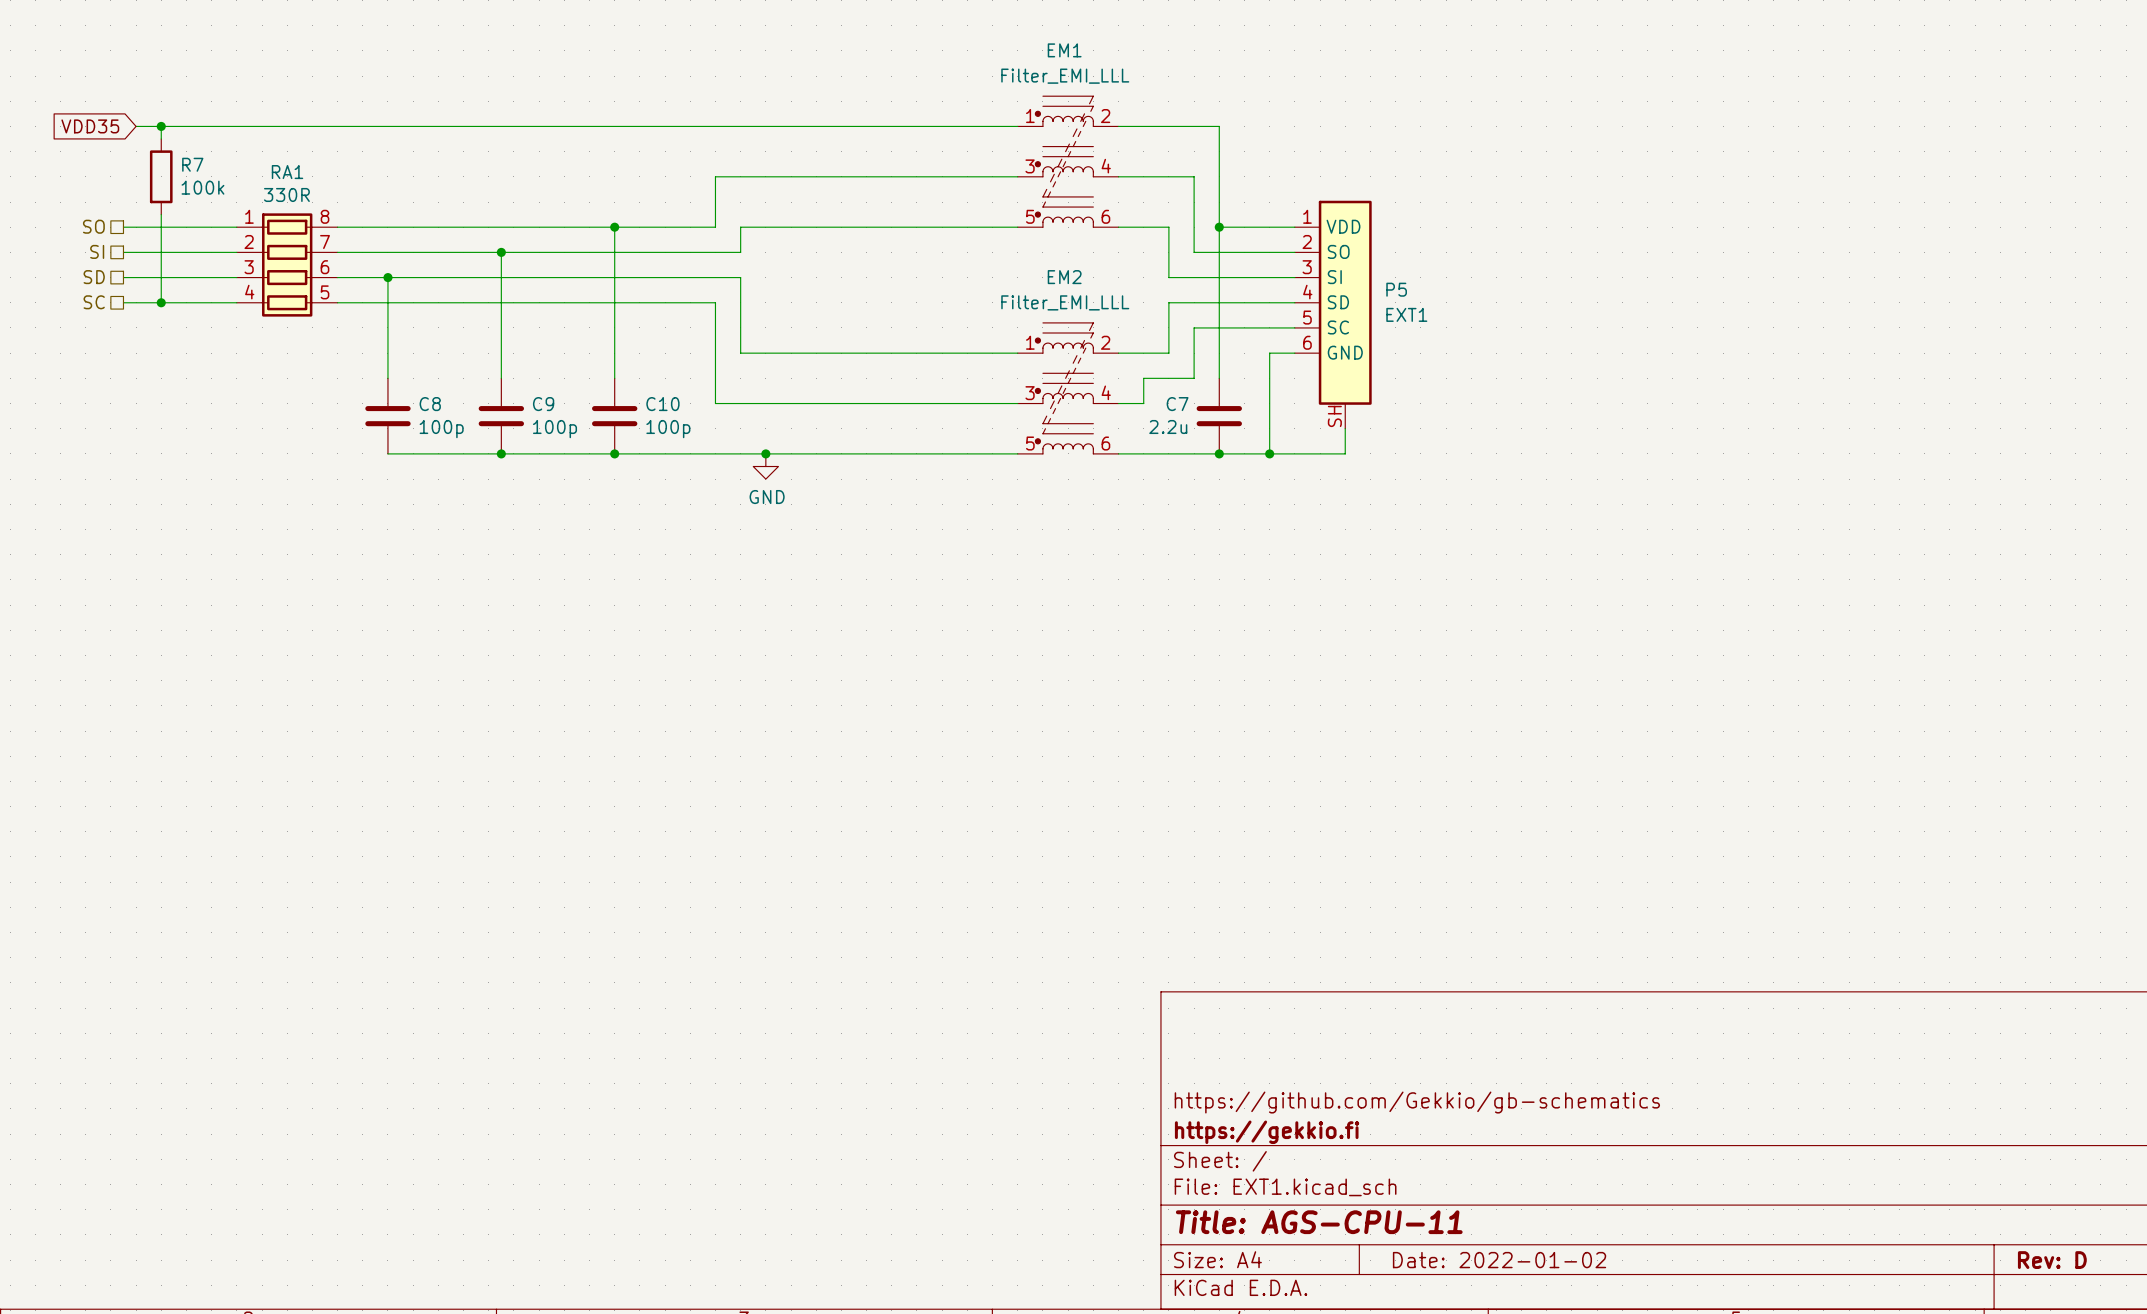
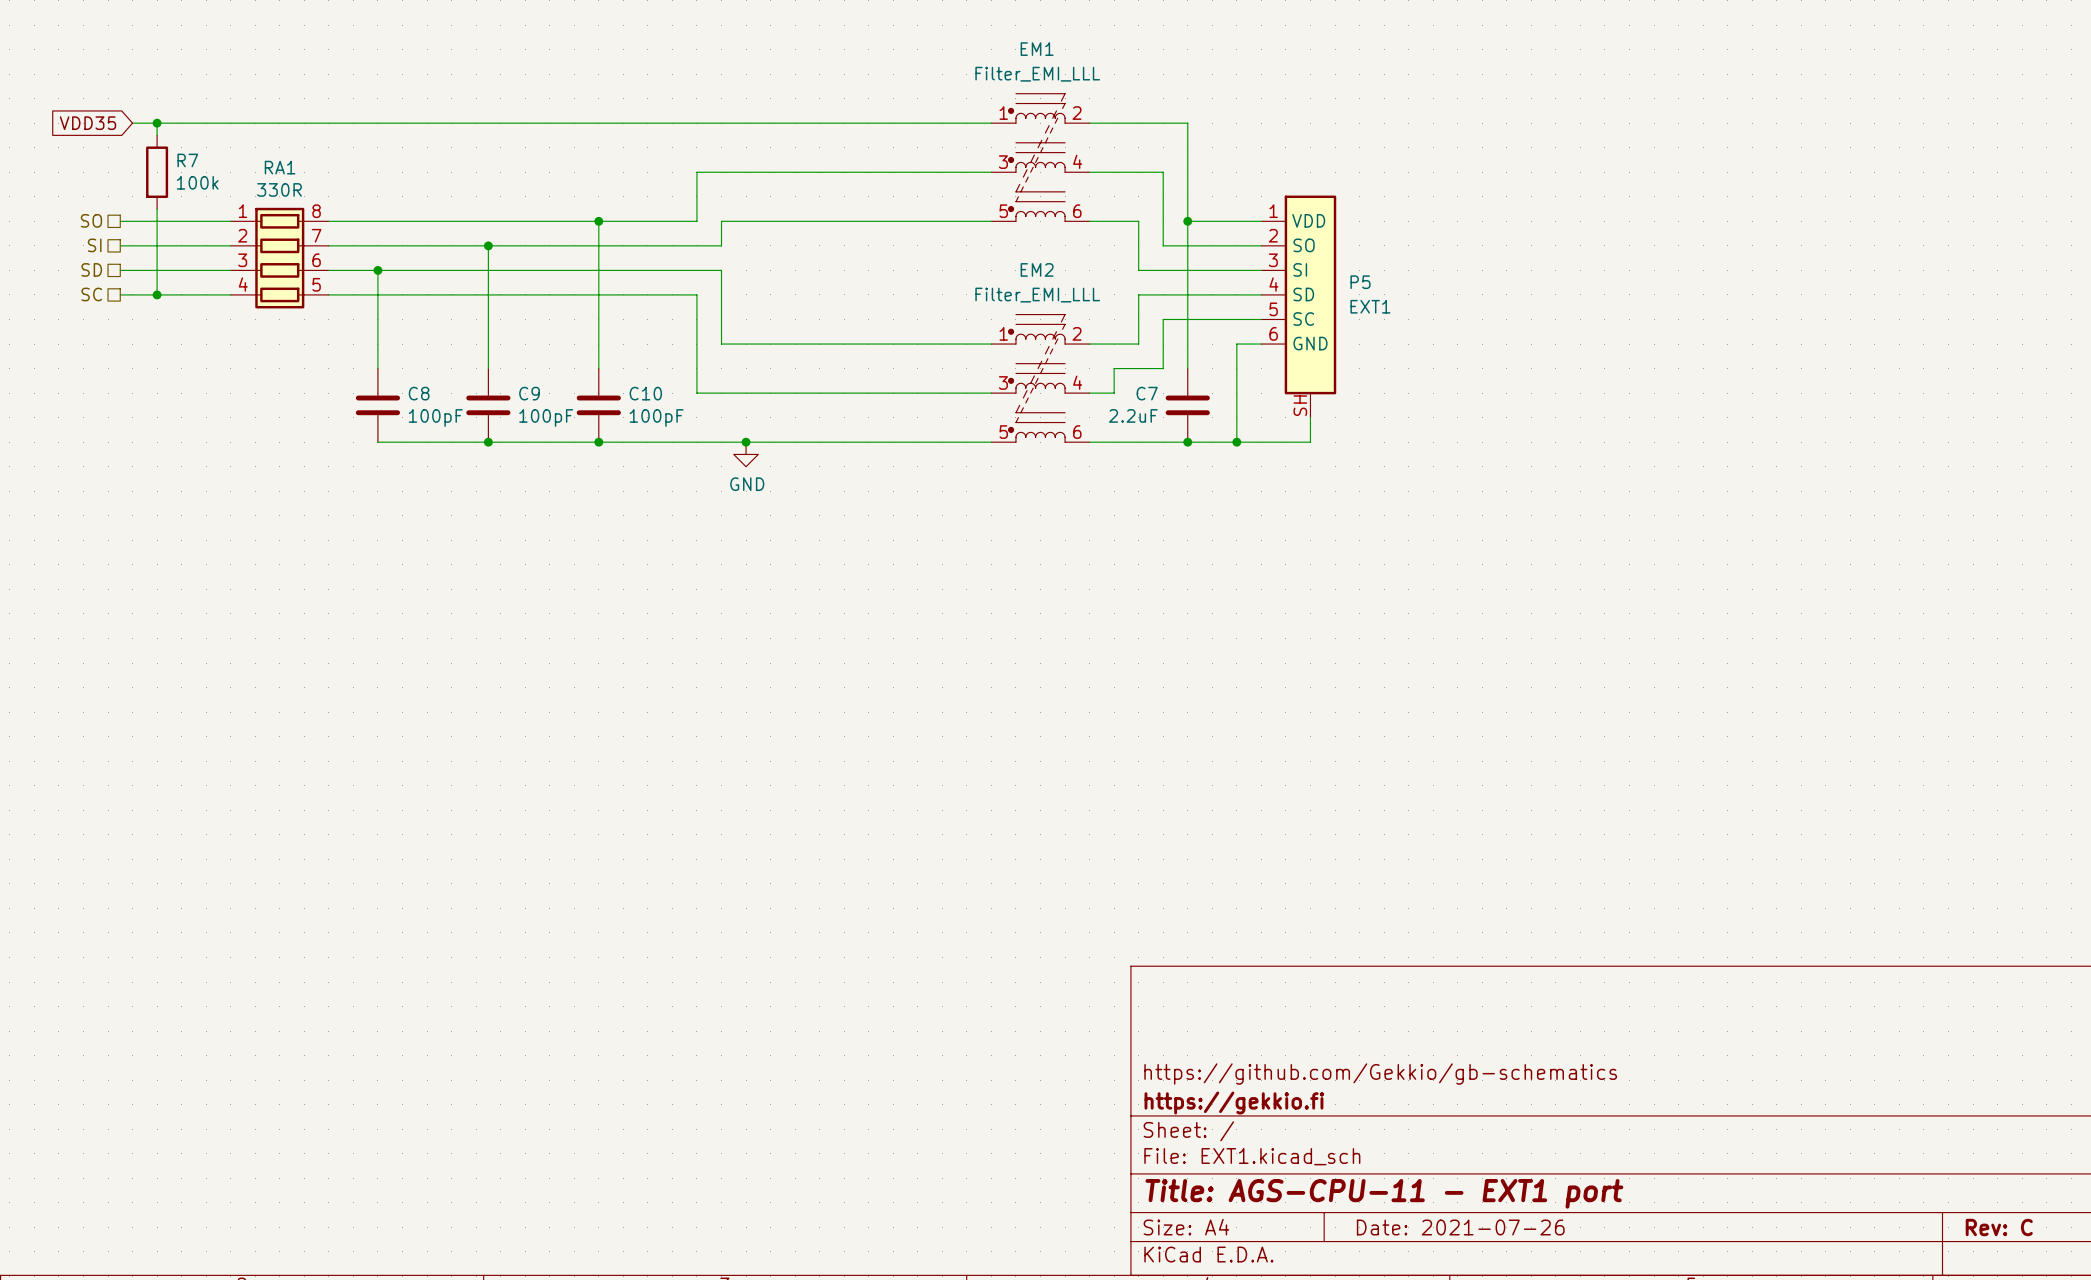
C7 value: 2.2u (1168, 426) -> 2.2uF (1133, 415)
C8 value: 100p (441, 429) -> 100pF (435, 418)
C9 value: 100p (554, 429) -> 100pF (546, 418)
C10 value: 100p (668, 429) -> 100pF (656, 418)
title block: Title: AGS-CPU-11 (1319, 1222) -> Title: AGS-CPU-11 - EXT1 port (1384, 1193)
title block: Date: 2022-01-02 (1499, 1260) -> Date: 2021-07-26 (1460, 1227)
title block: Rev: D (2052, 1260) -> Rev: C (1999, 1227)

